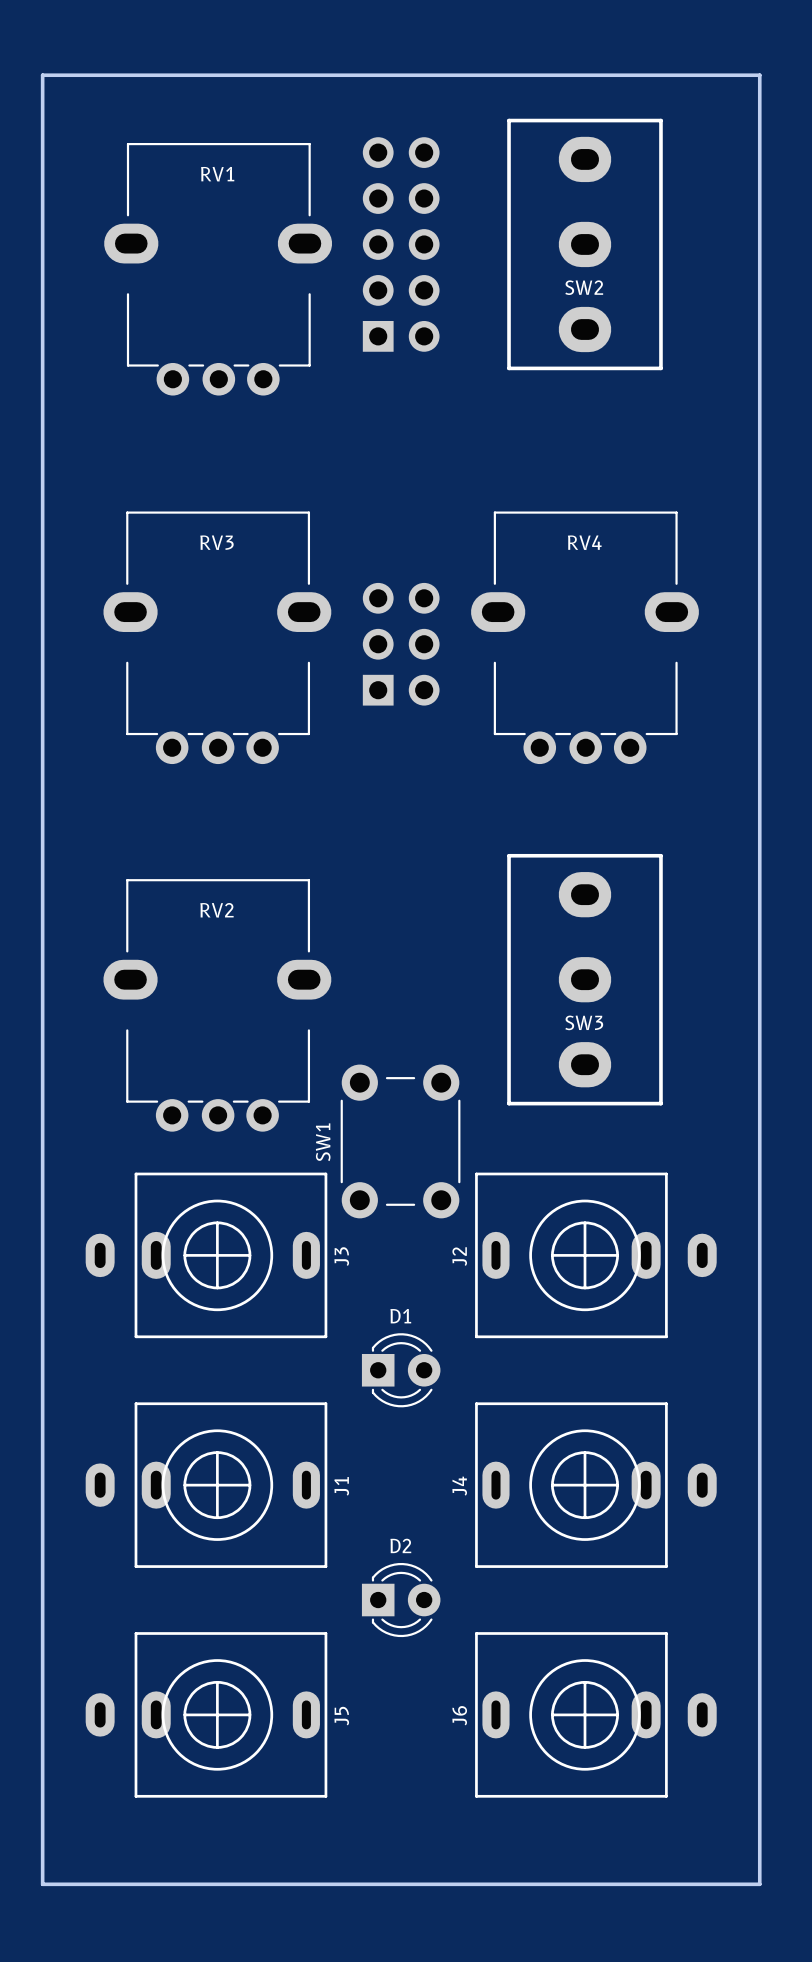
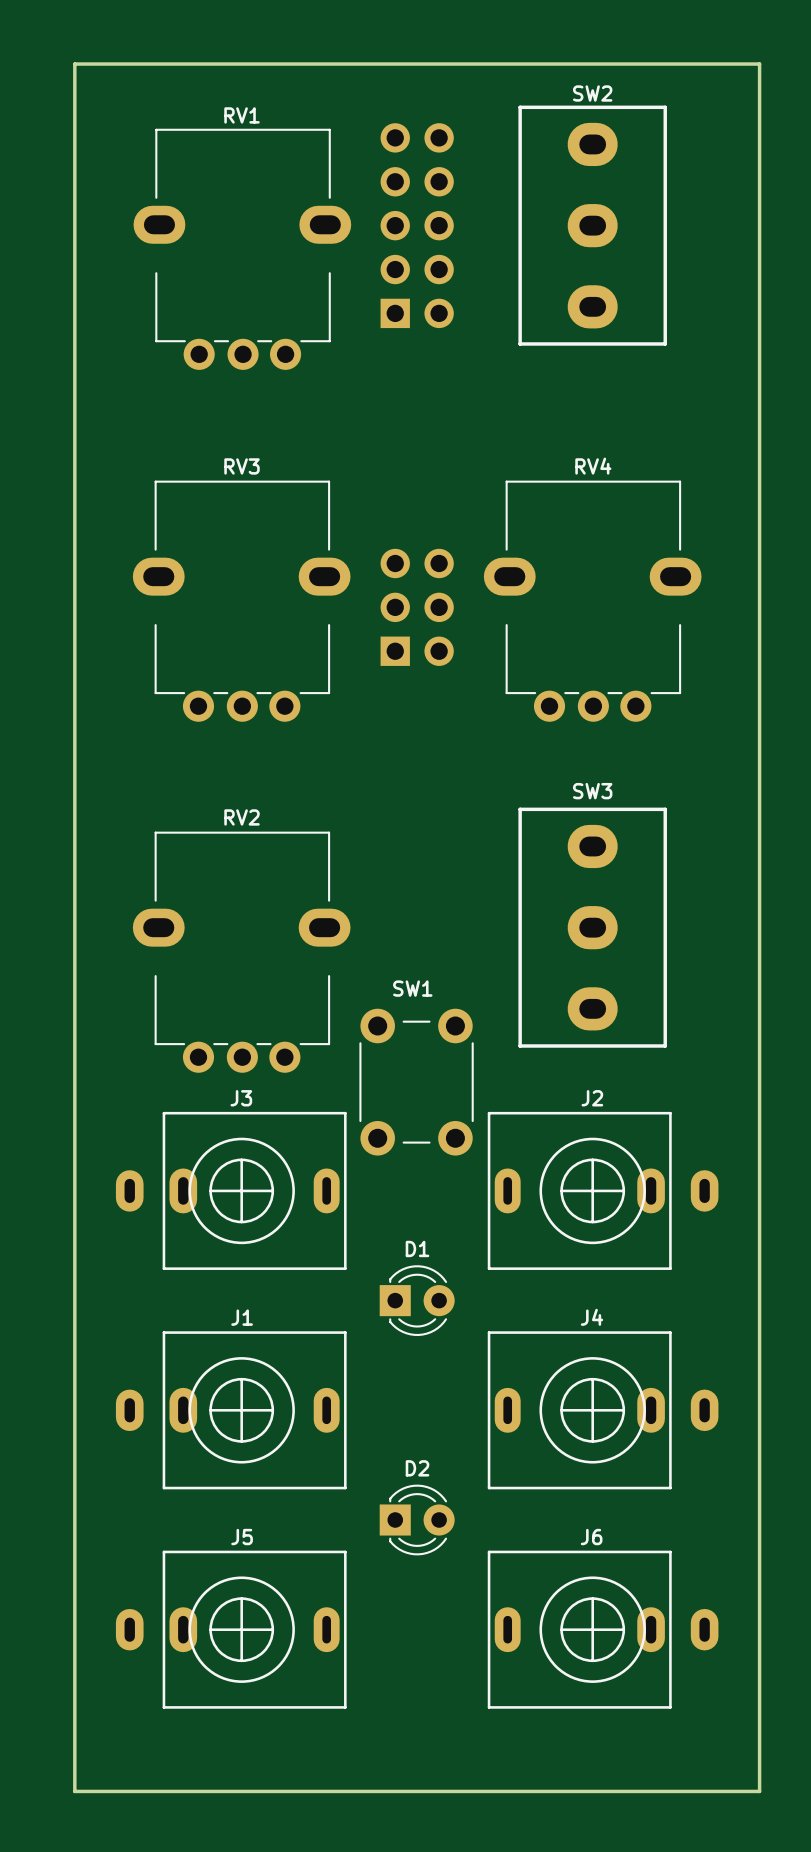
RV1 name position: RV1 (217, 174) -> RV1 (242, 115)
SW2 name position: SW2 (584, 287) -> SW2 (592, 93)
RV3 name position: RV3 (216, 542) -> RV3 (242, 466)
RV4 name position: RV4 (584, 542) -> RV4 (593, 466)
RV2 name position: RV2 (216, 910) -> RV2 (242, 817)
SW3 name position: SW3 (584, 1022) -> SW3 (592, 791)
SW1 name rotation: 0° (323, 1142) -> 90° clockwise (412, 988)
SW1 name position: SW1 (323, 1142) -> SW1 (412, 988)
J3 name rotation: 0° (341, 1256) -> 90° clockwise (241, 1098)
J3 name position: J3 (341, 1256) -> J3 (241, 1098)
J2 name rotation: 0° (459, 1256) -> 90° clockwise (592, 1098)
J2 name position: J2 (459, 1256) -> J2 (592, 1098)
J1 name rotation: 0° (341, 1486) -> 90° clockwise (242, 1317)
J1 name position: J1 (341, 1486) -> J1 (242, 1317)
J4 name rotation: 0° (459, 1486) -> 90° clockwise (591, 1317)
J4 name position: J4 (459, 1486) -> J4 (591, 1317)
J6 name rotation: 0° (459, 1715) -> 90° clockwise (591, 1537)
J6 name position: J6 (459, 1715) -> J6 (591, 1537)
J5 name rotation: 0° (341, 1716) -> 90° clockwise (242, 1537)
J5 name position: J5 (341, 1716) -> J5 (242, 1537)

